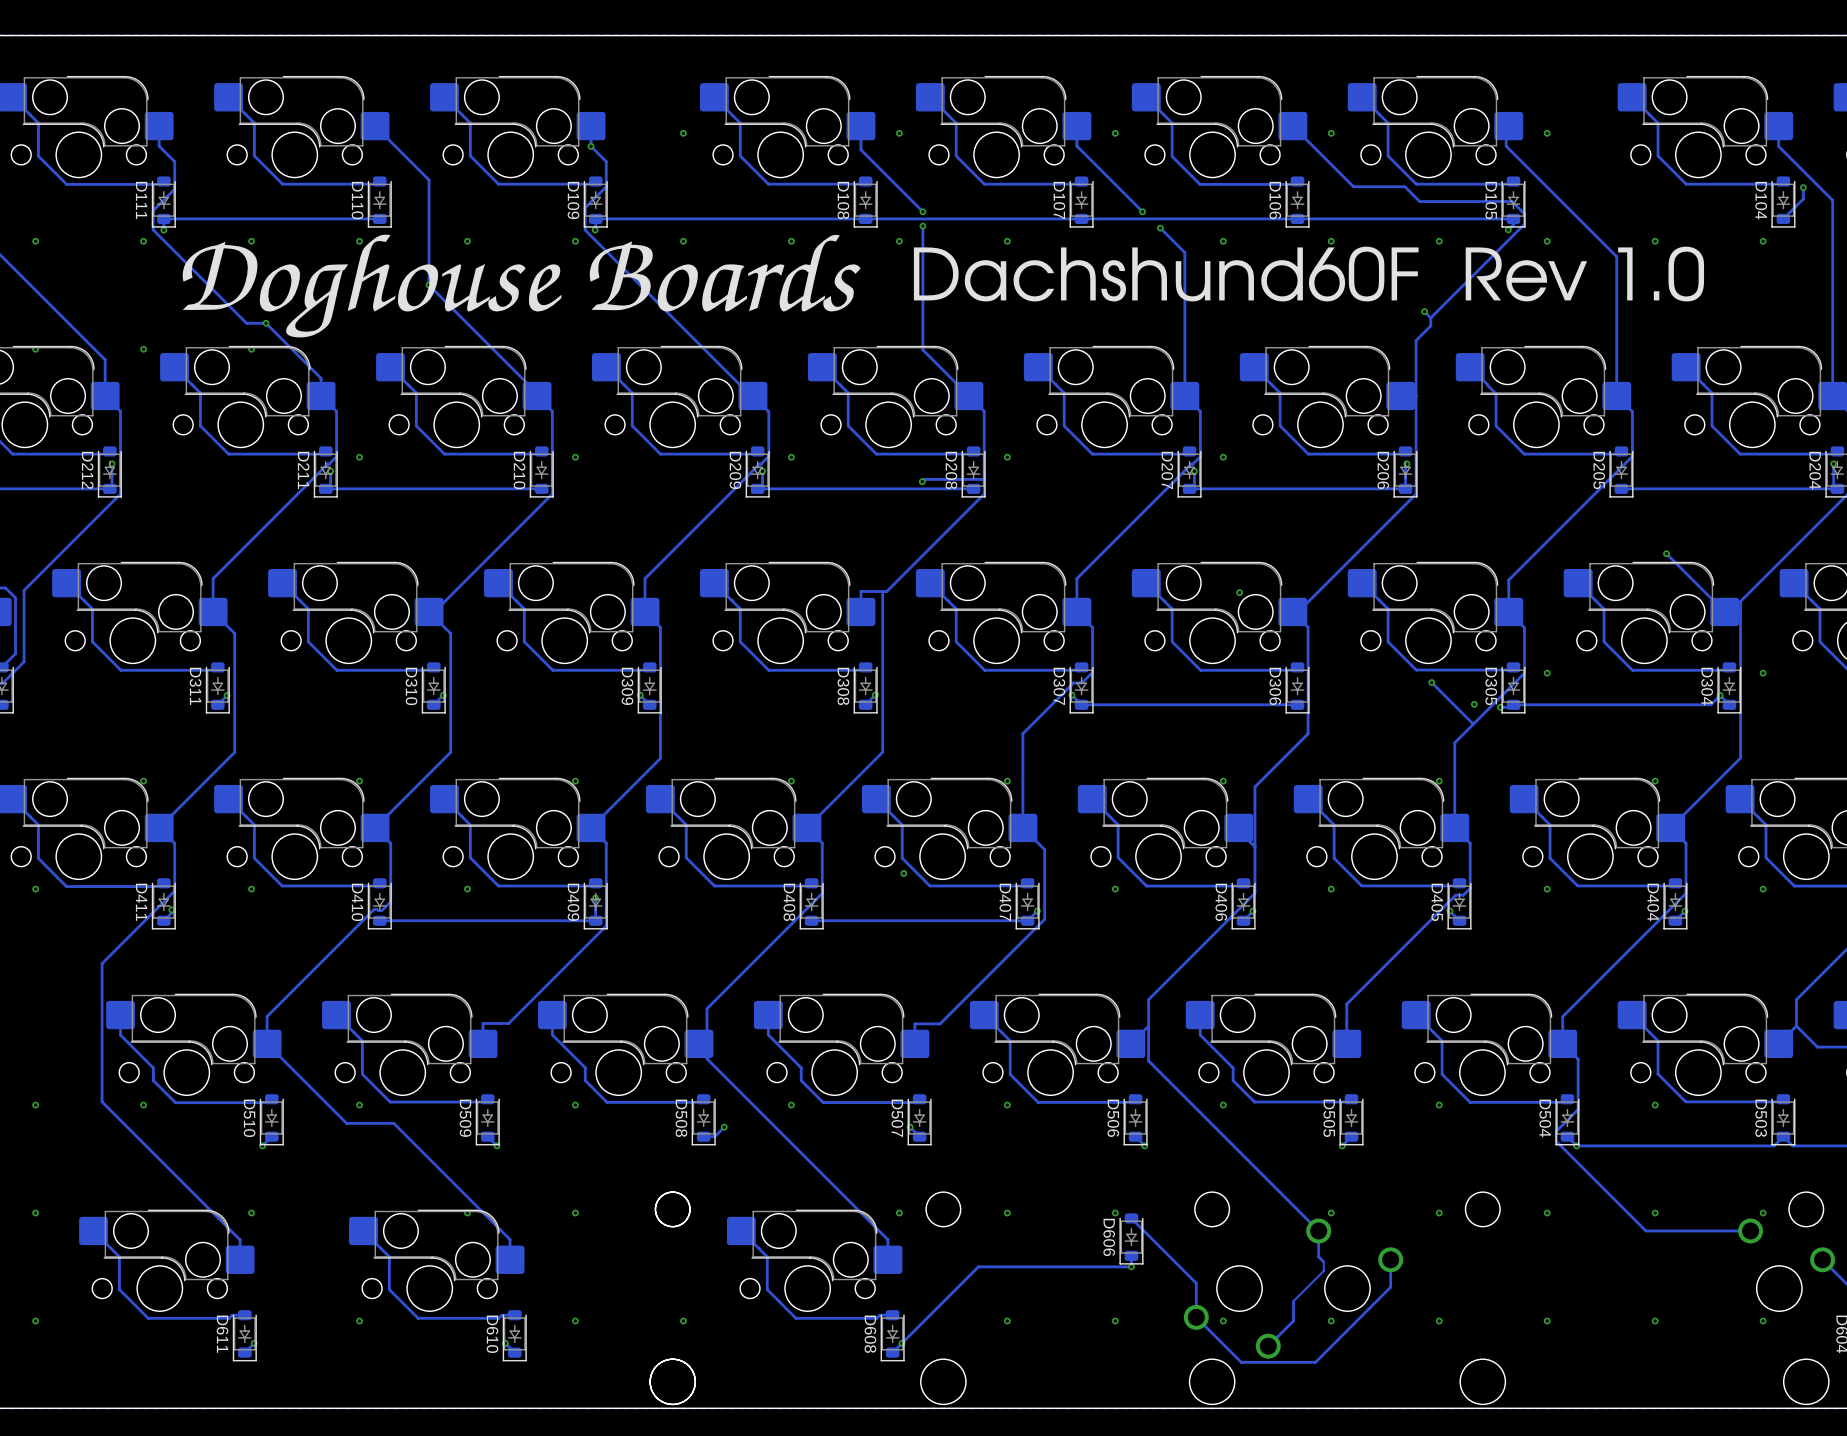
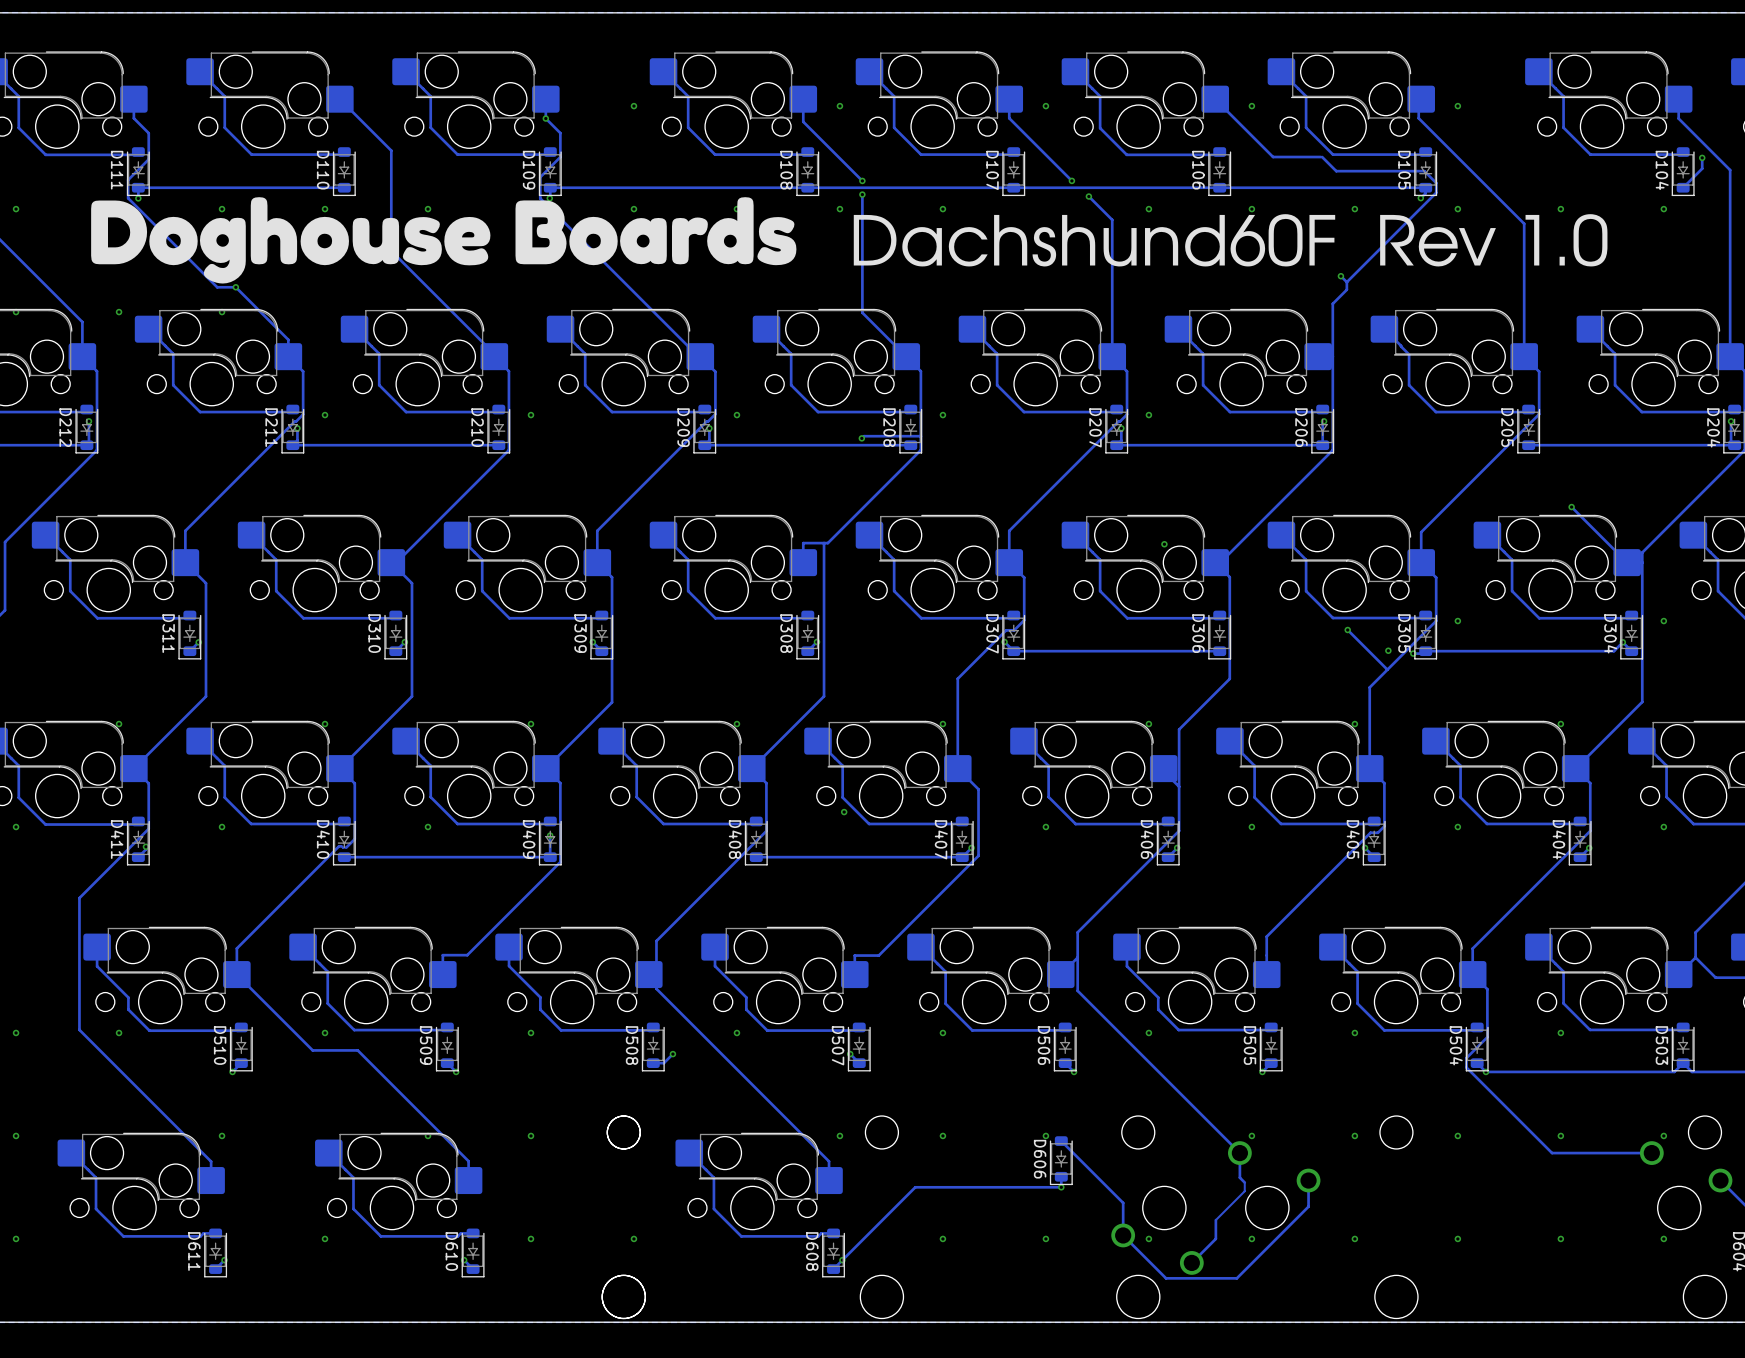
drawing: none -> [91, 197, 491, 284]
drawing: none -> [515, 197, 797, 266]
drawing: [182, 234, 562, 338] -> none
drawing: [589, 234, 861, 312] -> none

